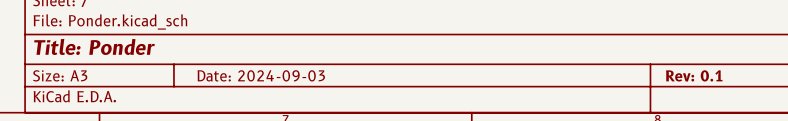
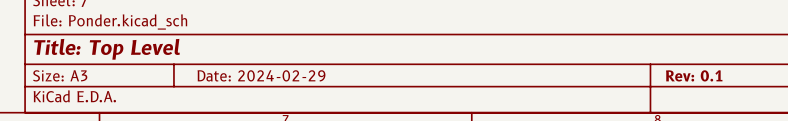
title block: Title: Ponder (94, 46) -> Title: Top Level (107, 49)
title block: Date: 2024-09-03 (261, 75) -> Date: 2024-02-29 (261, 75)

